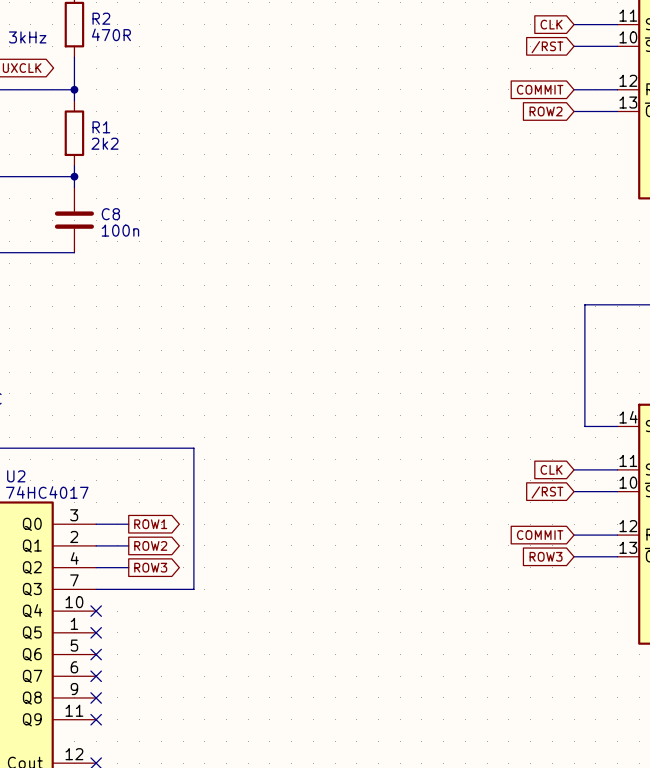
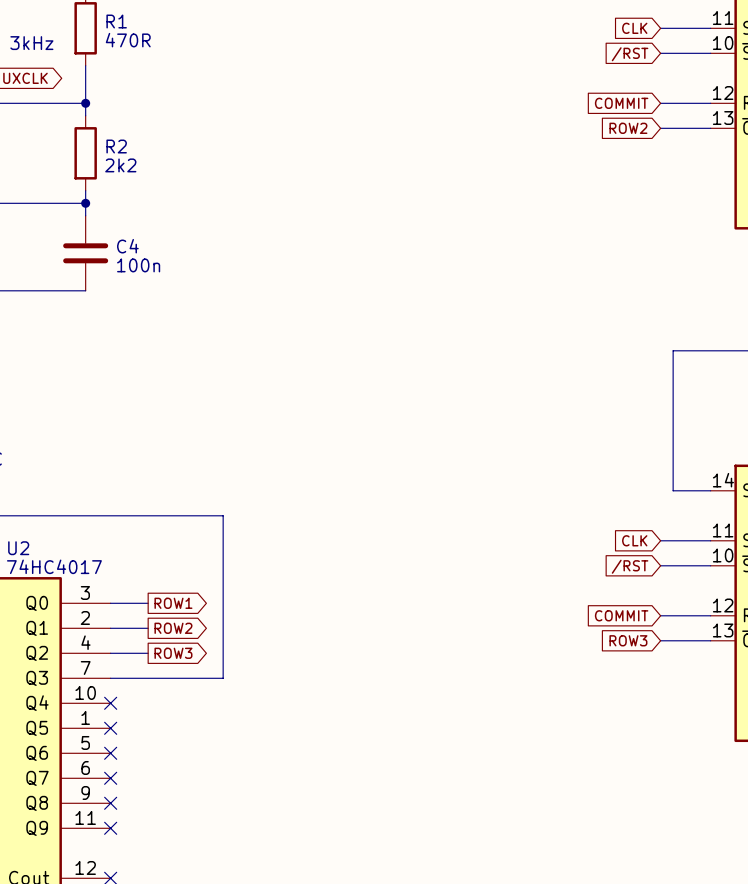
R2 name: R2 (101, 18) -> R1 (116, 21)
R1 name: R1 (101, 127) -> R2 (116, 146)
C8 name: C8 (110, 214) -> C4 (127, 246)

